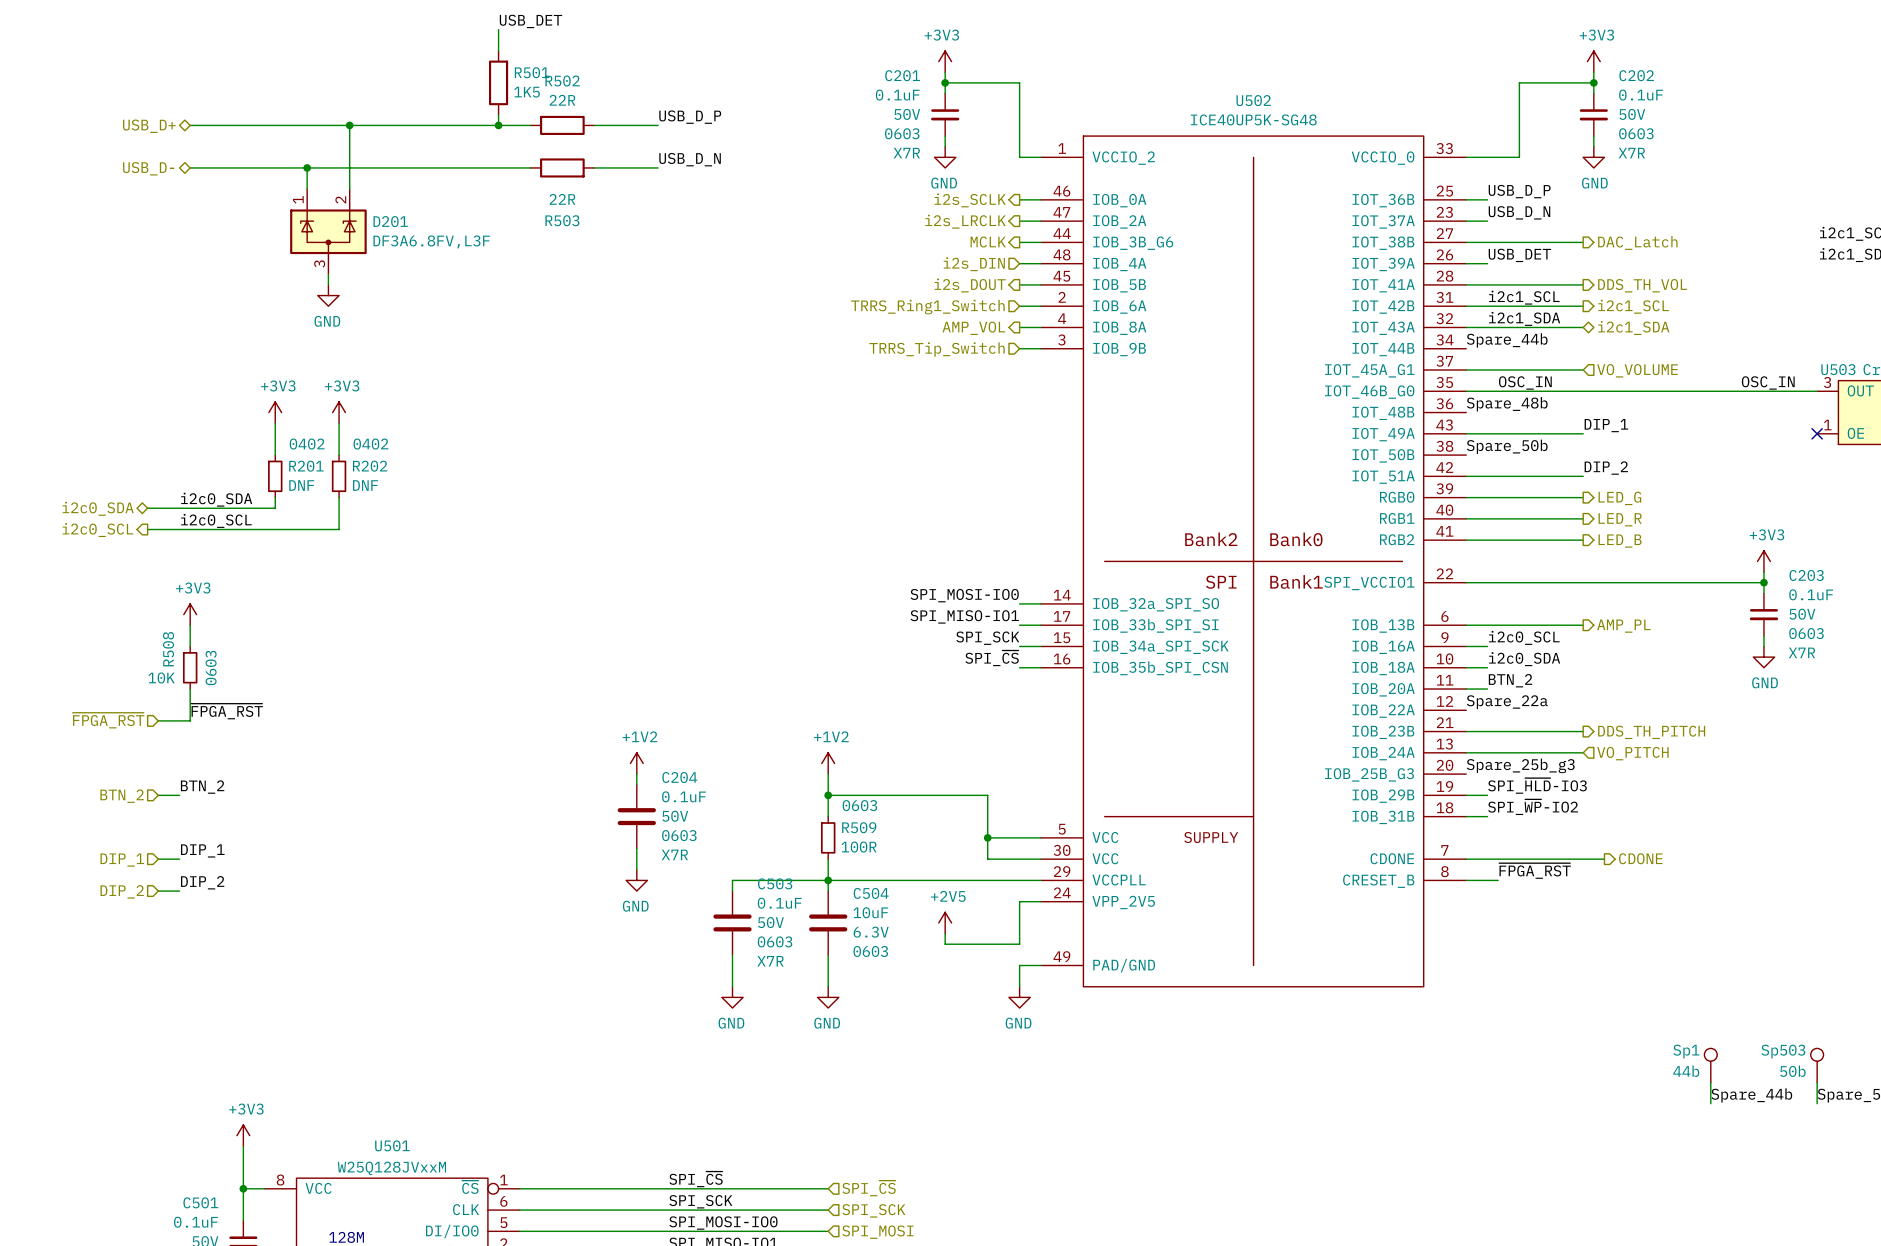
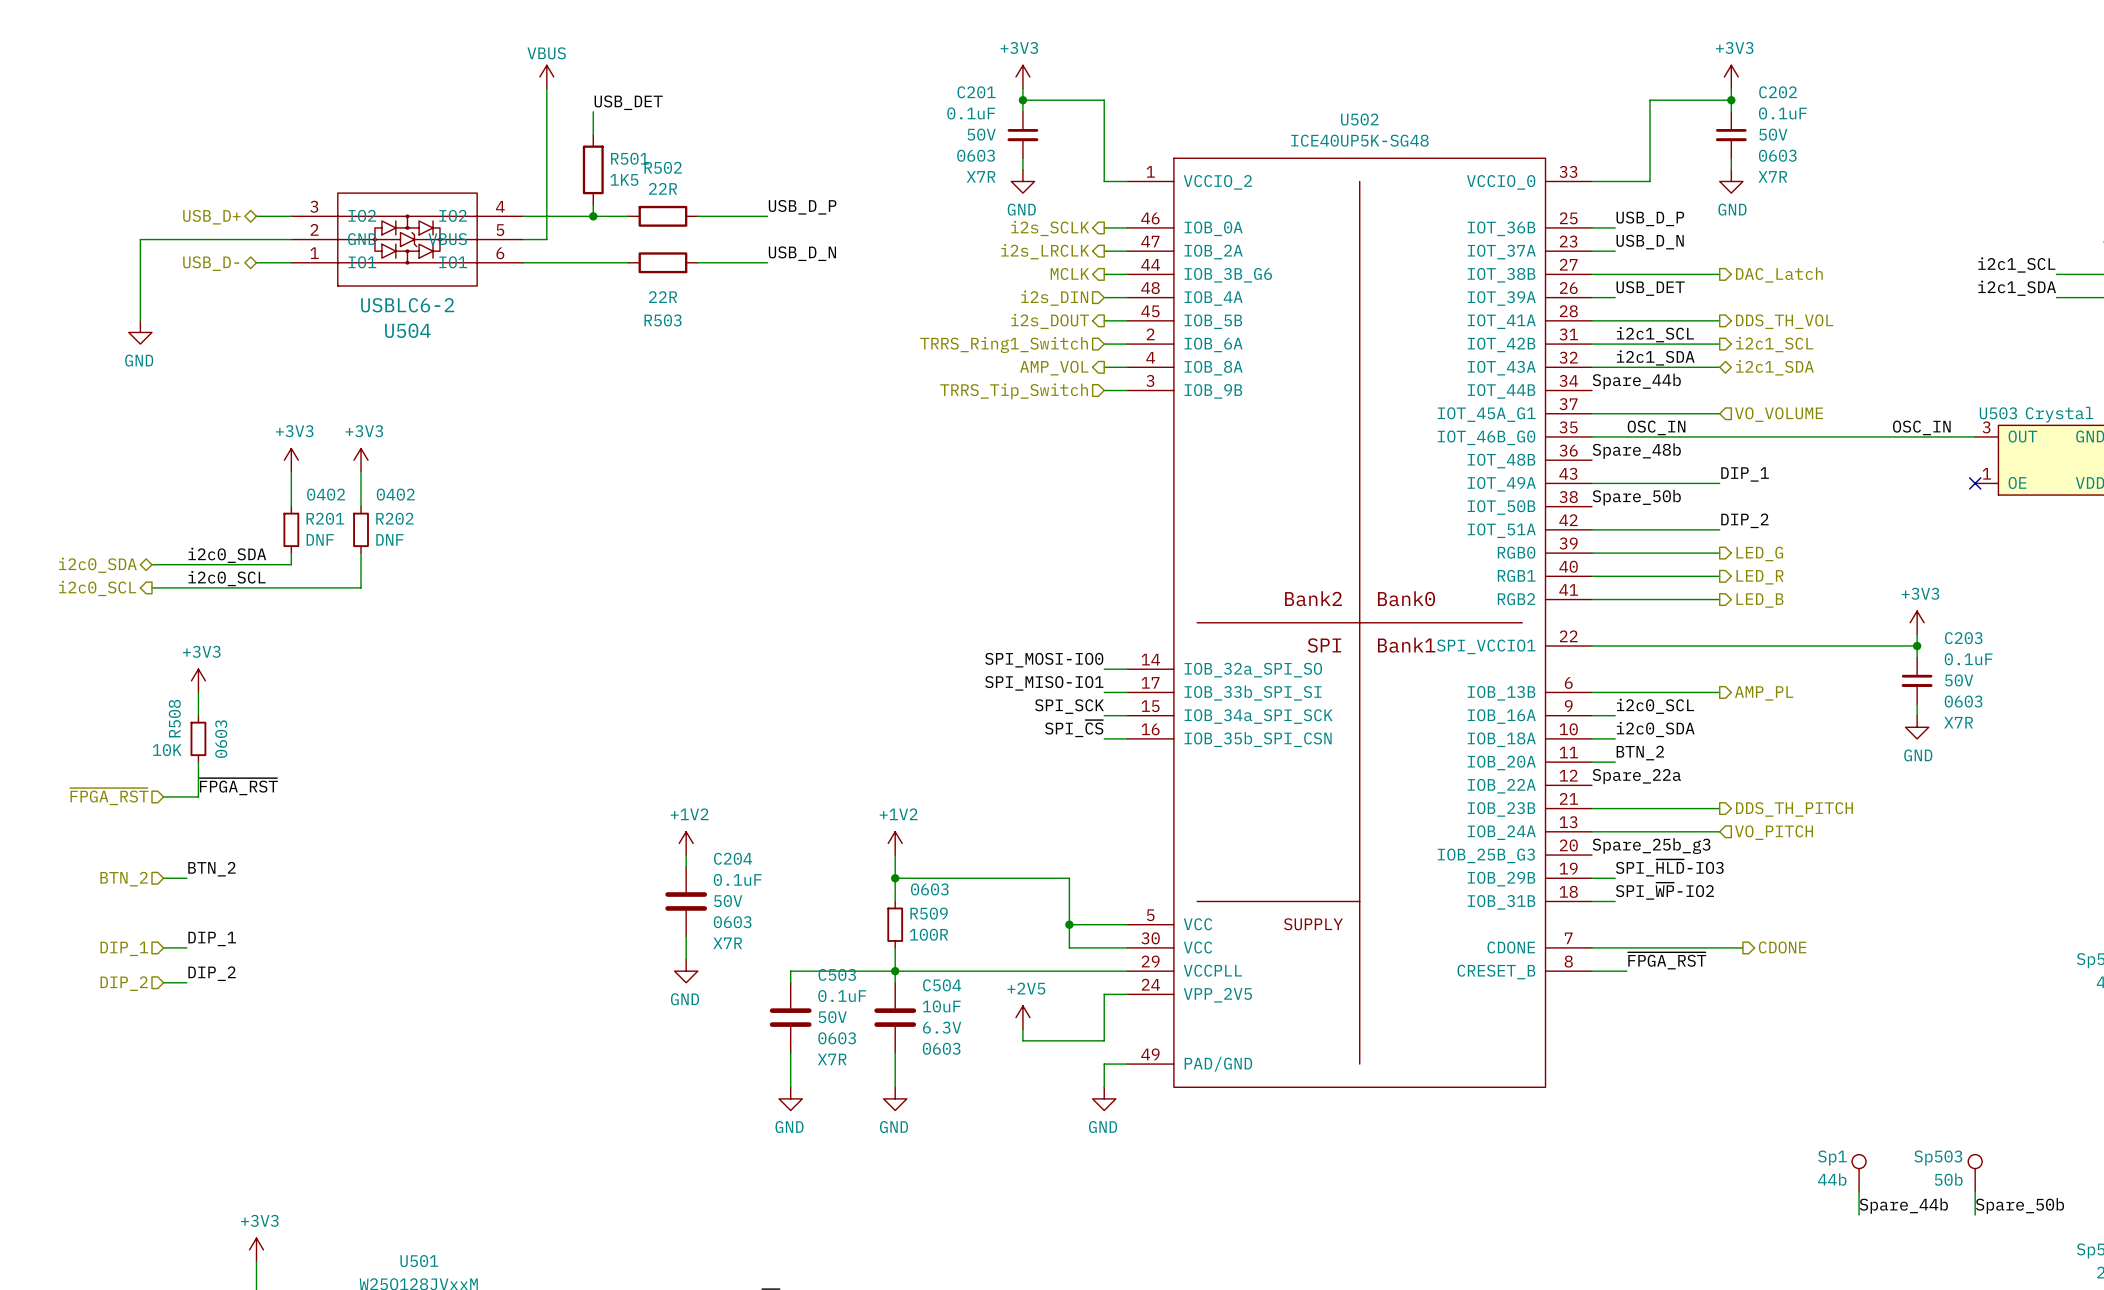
label position: USB_DET (530, 21) -> USB_DET (628, 102)
wire: (498, 29) (498, 51) -> (593, 111) (593, 135)
power symbol: none -> VBUS (546, 76)
wire: none -> (546, 88) (546, 239) (523, 239)
R501 position: (498, 82) -> (593, 169)
wire: (498, 114) (498, 125) -> (593, 204) (593, 216)
label position: USB_D_P (690, 117) -> USB_D_P (802, 207)
wire: (190, 125) (530, 125) -> none
wire: (349, 125) (349, 189) -> none
junction: (349, 125) -> none
junction: (498, 125) -> none
R502 position: (562, 125) -> (662, 216)
wire: (594, 125) (658, 125) -> (697, 216) (767, 216)
hierarchical label position: USB_D+ (149, 126) -> USB_D+ (211, 217)
label position: USB_D_N (690, 159) -> USB_D_N (802, 253)
wire: (190, 167) (530, 167) -> none
wire: (307, 167) (307, 189) -> none
junction: (307, 167) -> none
R503 position: (562, 167) -> (662, 262)
wire: (594, 167) (658, 167) -> (697, 262) (767, 262)
hierarchical label position: USB_D- (148, 168) -> USB_D- (211, 263)
wire: none -> (256, 216) (291, 216)
wire: none -> (523, 216) (628, 216)
junction: none -> (593, 216)
wire: none -> (291, 239) (140, 239) (140, 320)
U504: none -> USBLC6-2 (407, 239)
wire: none -> (256, 262) (291, 262)
D201: DF3A6.8FV,L3F (328, 231) -> none
wire: none -> (523, 262) (628, 262)
wire: (328, 274) (328, 284) -> none
power symbol position: GND (328, 295) -> GND (140, 332)

